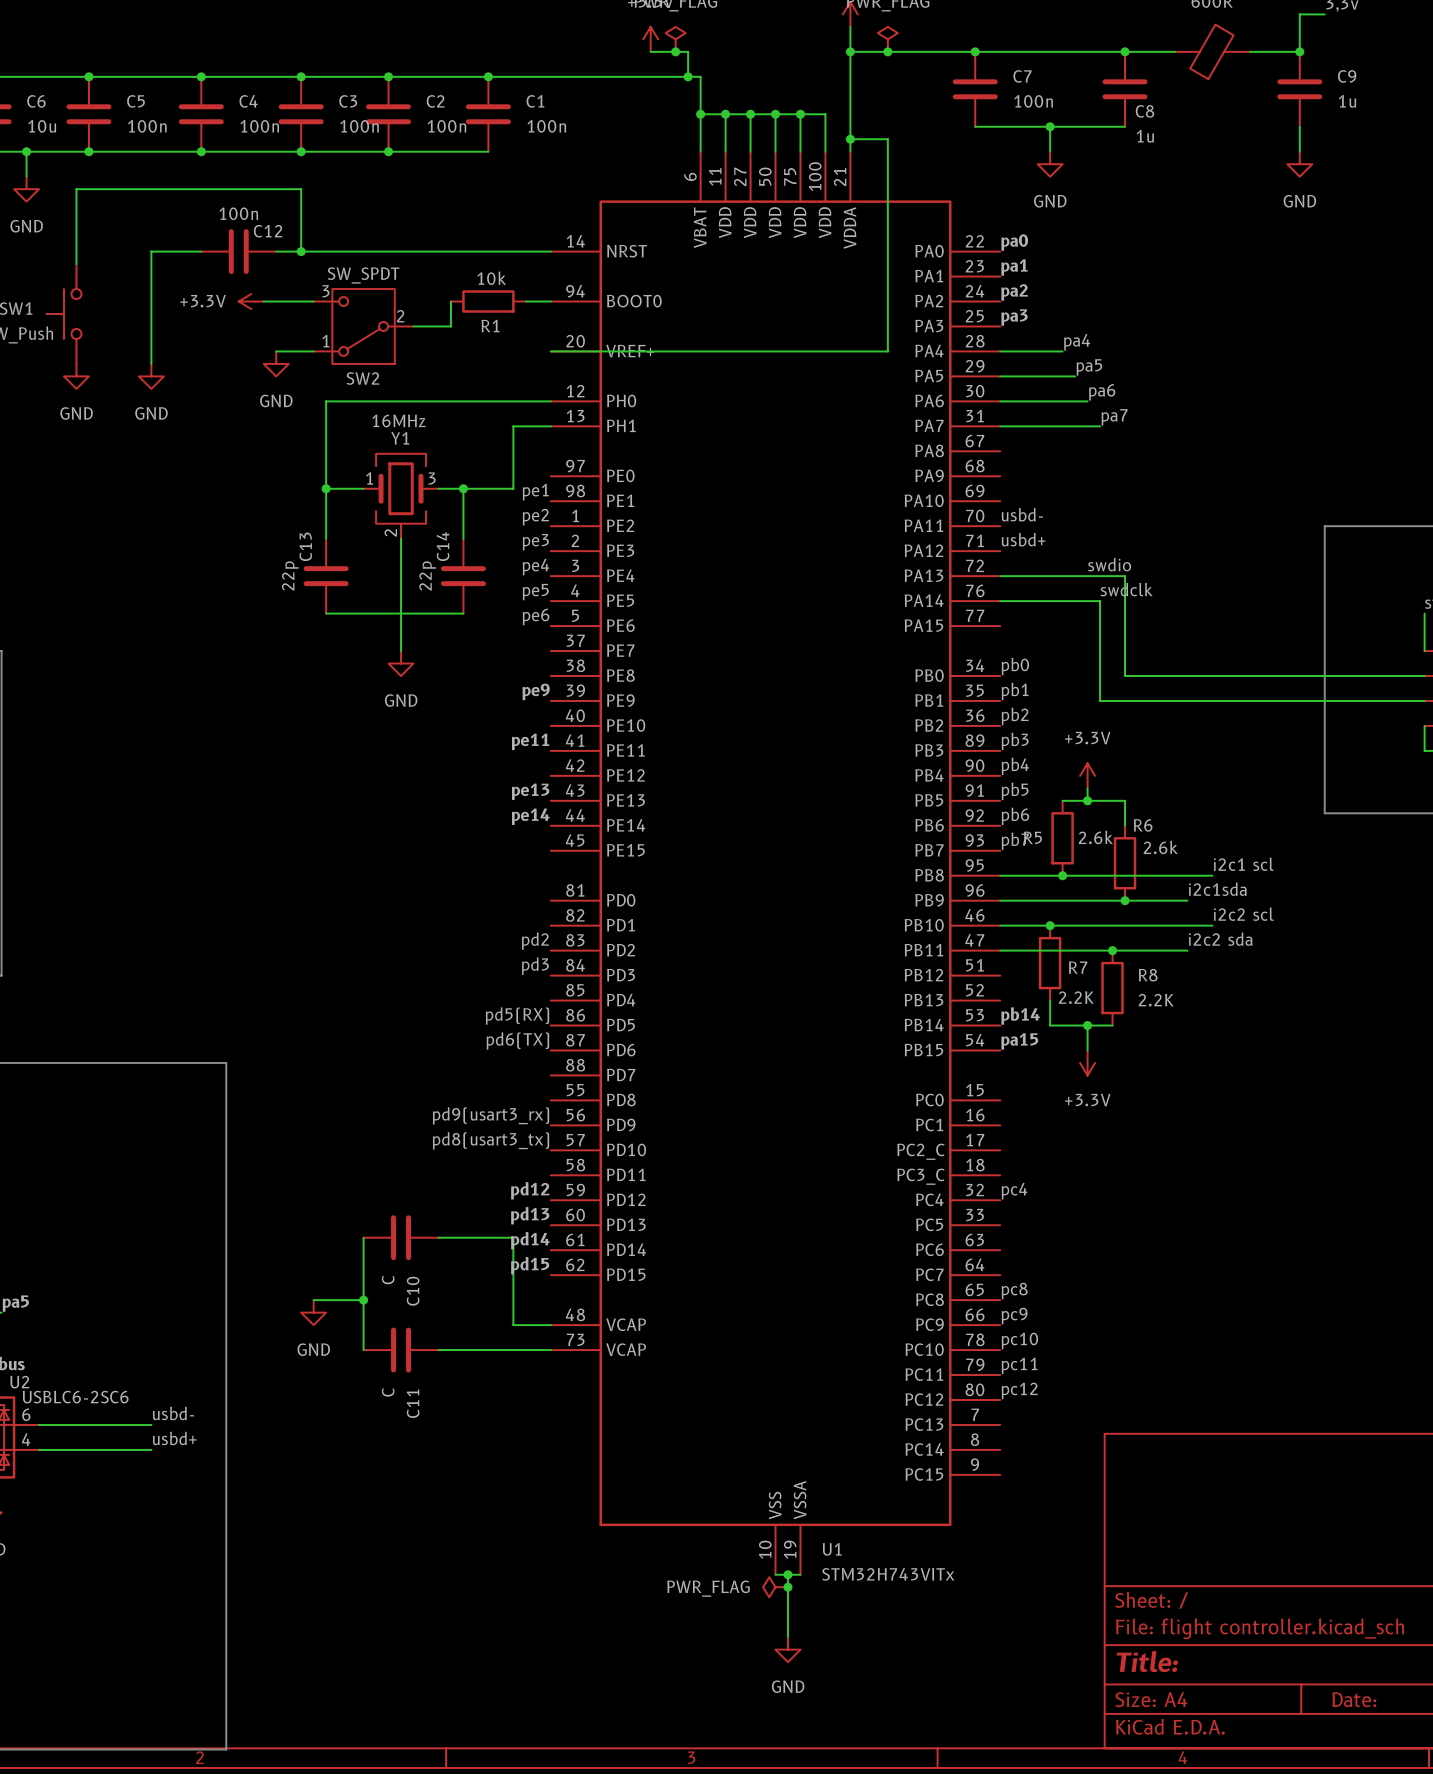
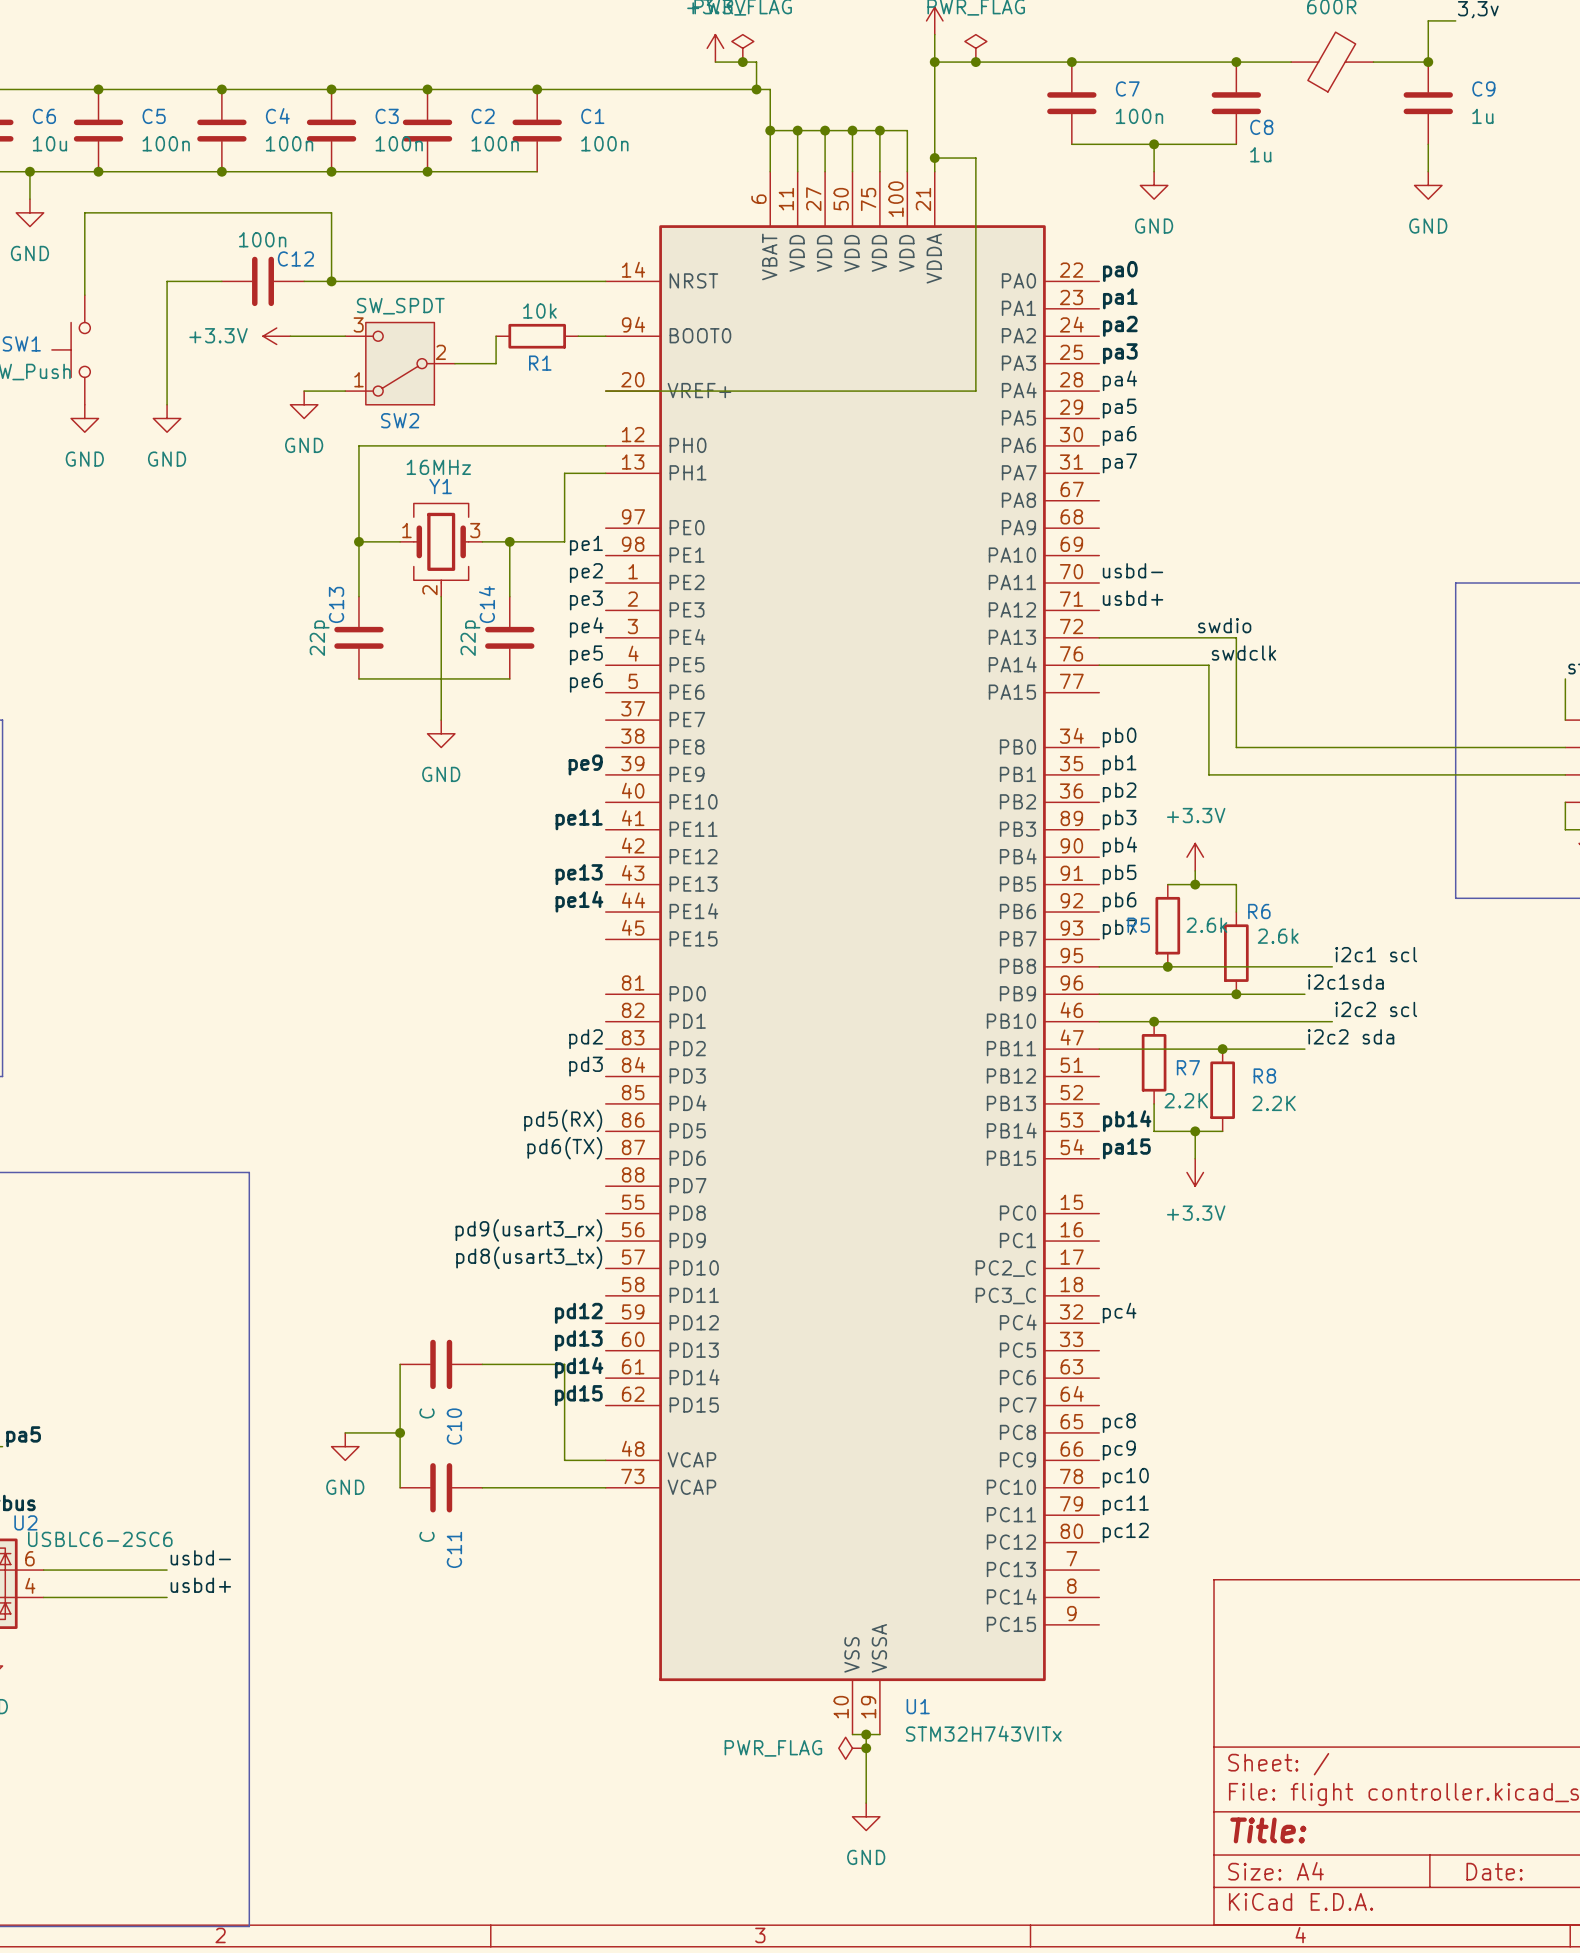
label position: pa4 (1077, 342) -> pa4 (1119, 380)
wire: (1000, 351) (1062, 351) -> none
label position: pa5 (1089, 367) -> pa5 (1119, 408)
wire: (1000, 376) (1075, 376) -> none
label position: pa6 (1102, 392) -> pa6 (1119, 435)
wire: (1000, 401) (1087, 401) -> none
label position: pa7 (1114, 417) -> pa7 (1119, 463)
wire: (1000, 426) (1100, 426) -> none

